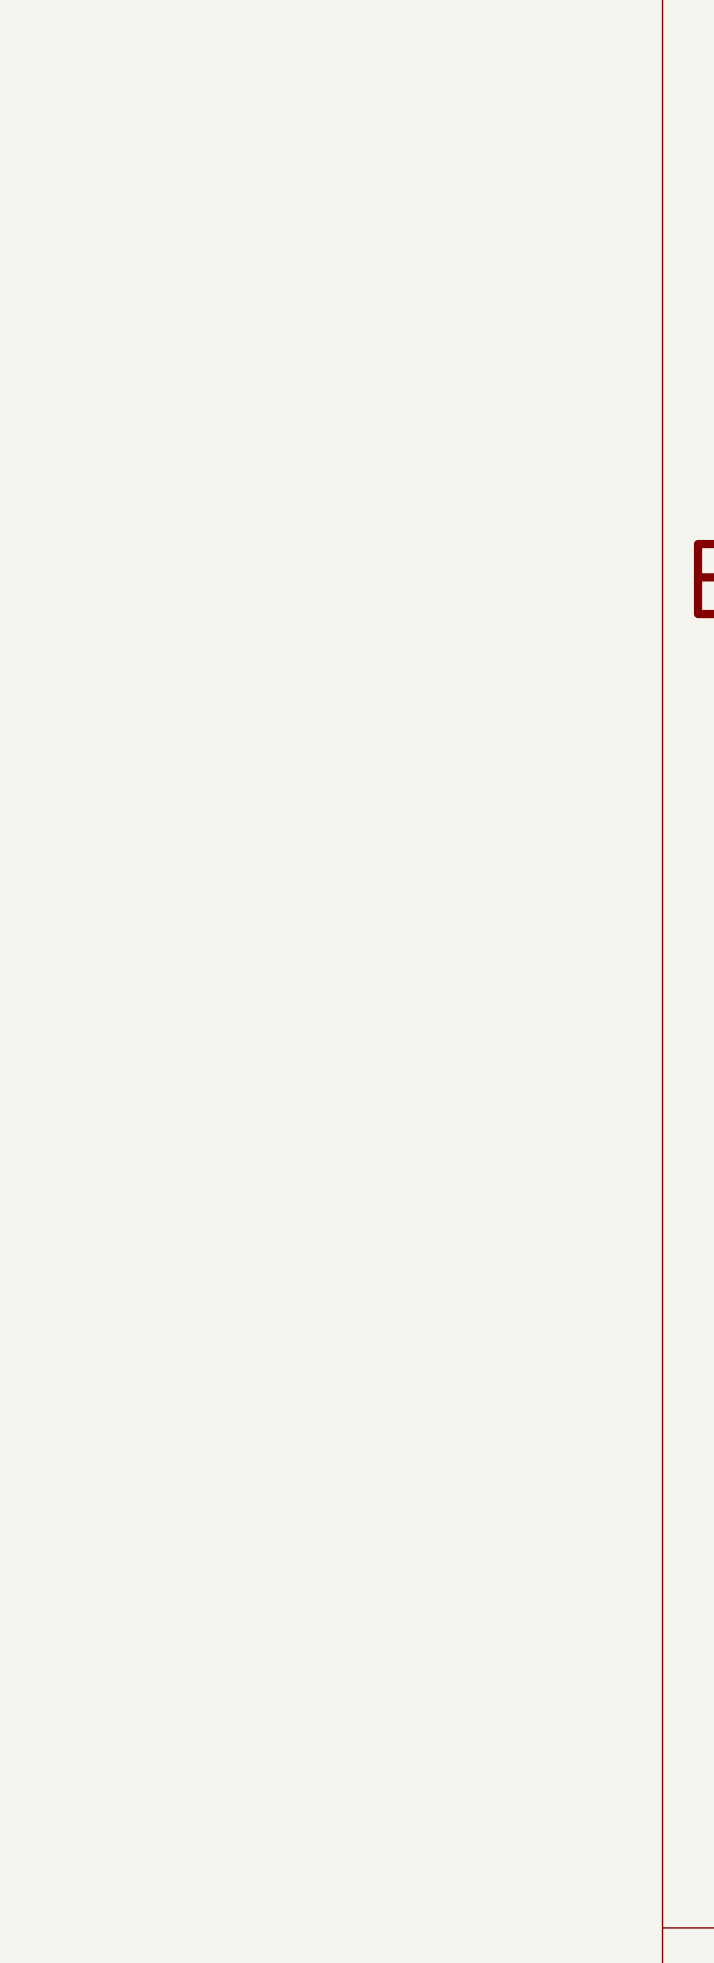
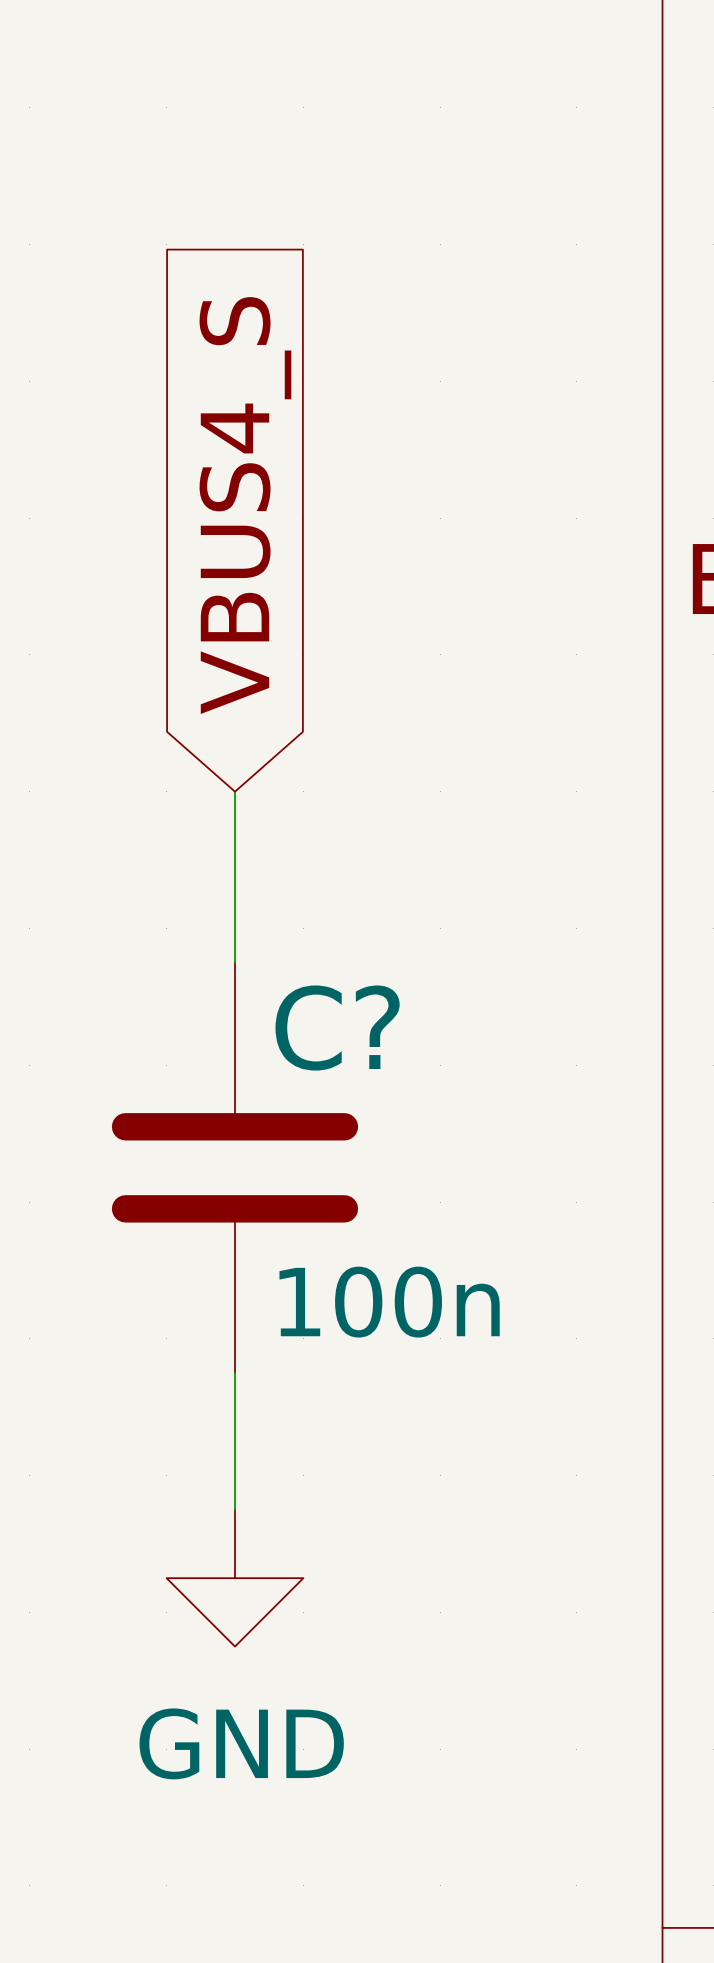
global label: none -> VBUS4_S (245, 505)
wire: none -> (234, 791) (234, 962)
C?: none -> (234, 1167)
wire: none -> (234, 1372) (234, 1509)
power symbol: none -> GND (234, 1578)

